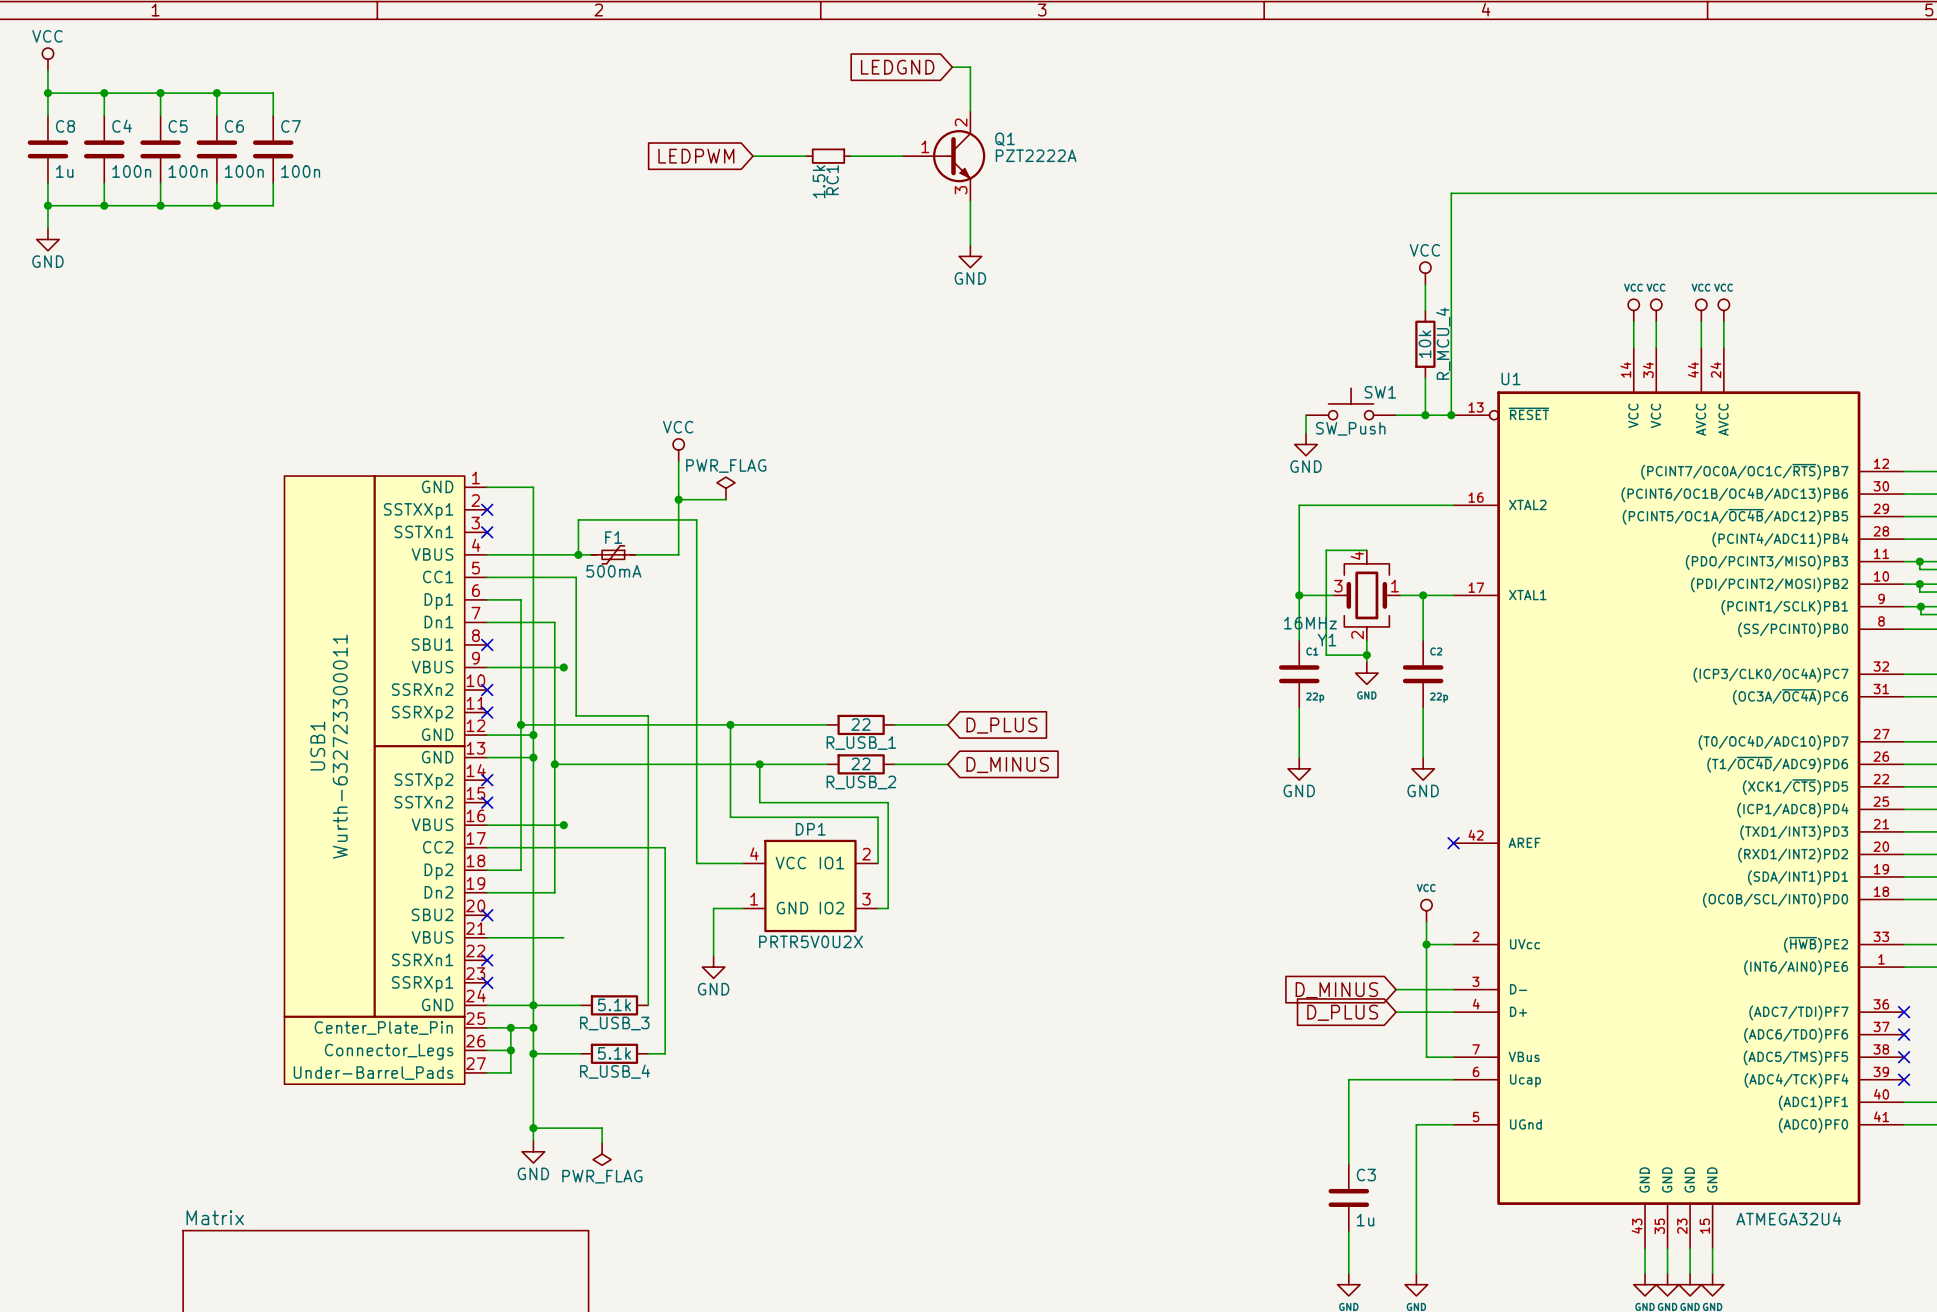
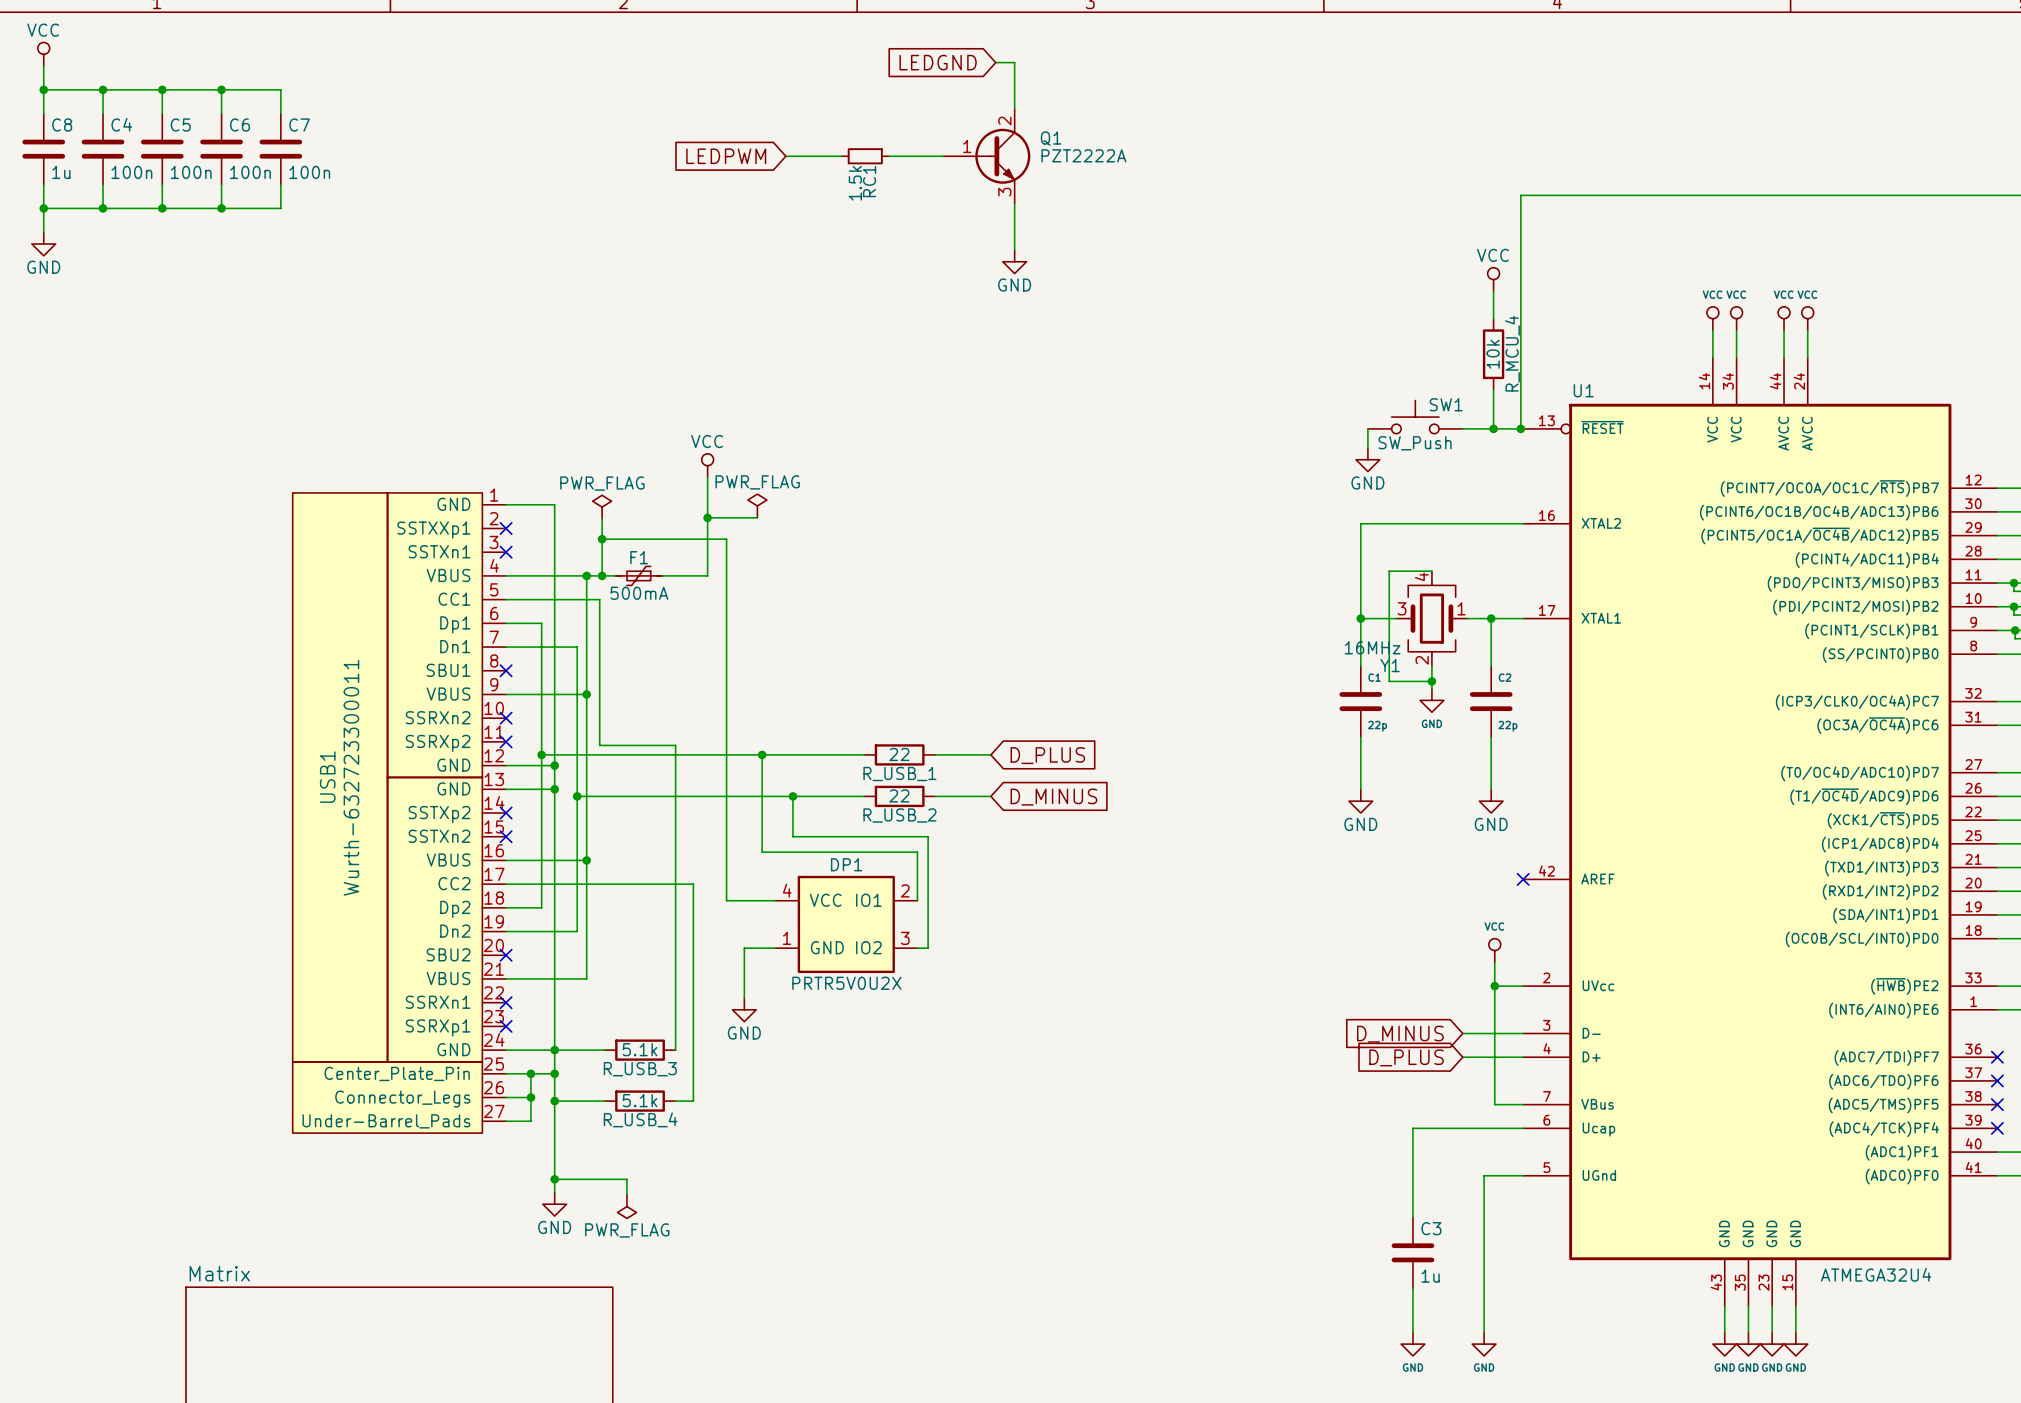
power symbol: none -> PWR_FLAG (602, 507)
wire: none -> (602, 519) (602, 539)
junction: none -> (602, 539)
wire: none -> (586, 575) (586, 978)
junction: none -> (586, 575)

